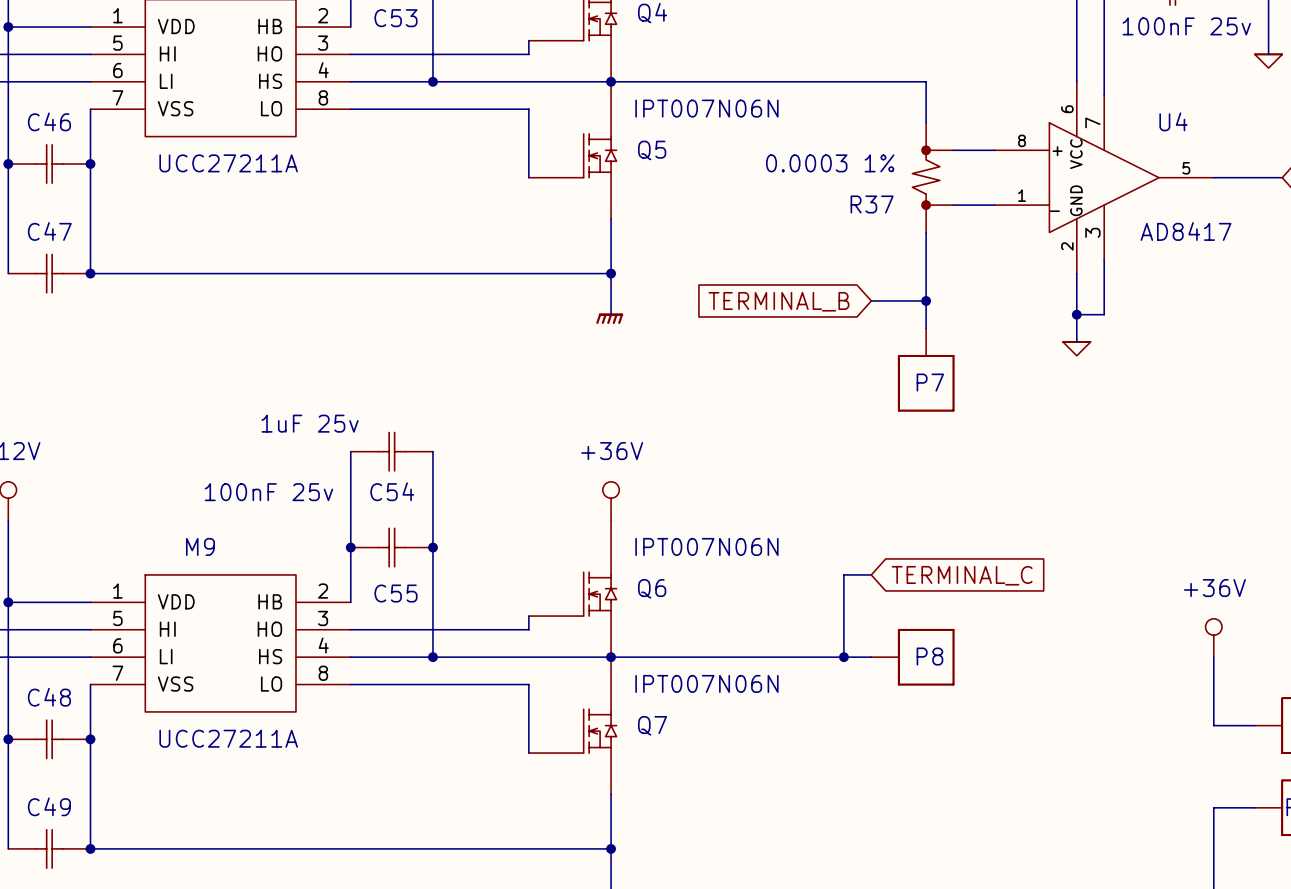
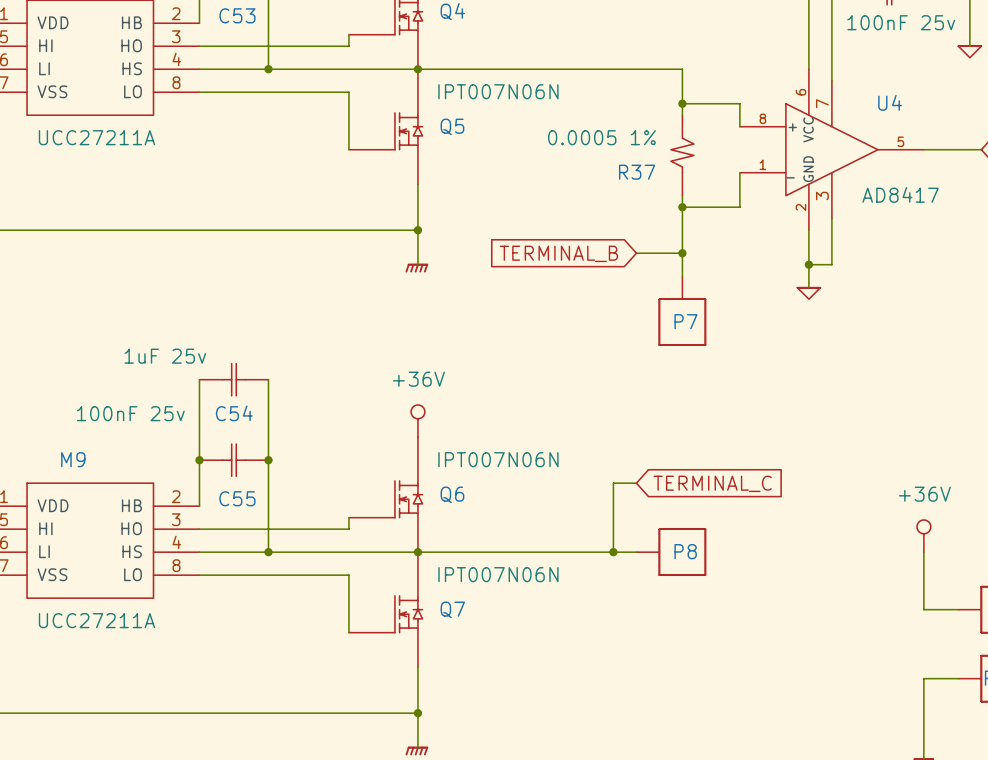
R37 symbol: [911, 122, 954, 233] -> [670, 115, 695, 196]
junction: none -> (682, 103)
wire: (953, 150) (994, 150) -> (682, 115) (682, 103) (739, 103) (739, 126)
R37 value: 0.0003 1% (830, 163) -> 0.0005 1% (601, 137)
wire: (953, 205) (994, 205) -> (682, 207) (739, 207) (739, 172)
junction: none -> (682, 207)

